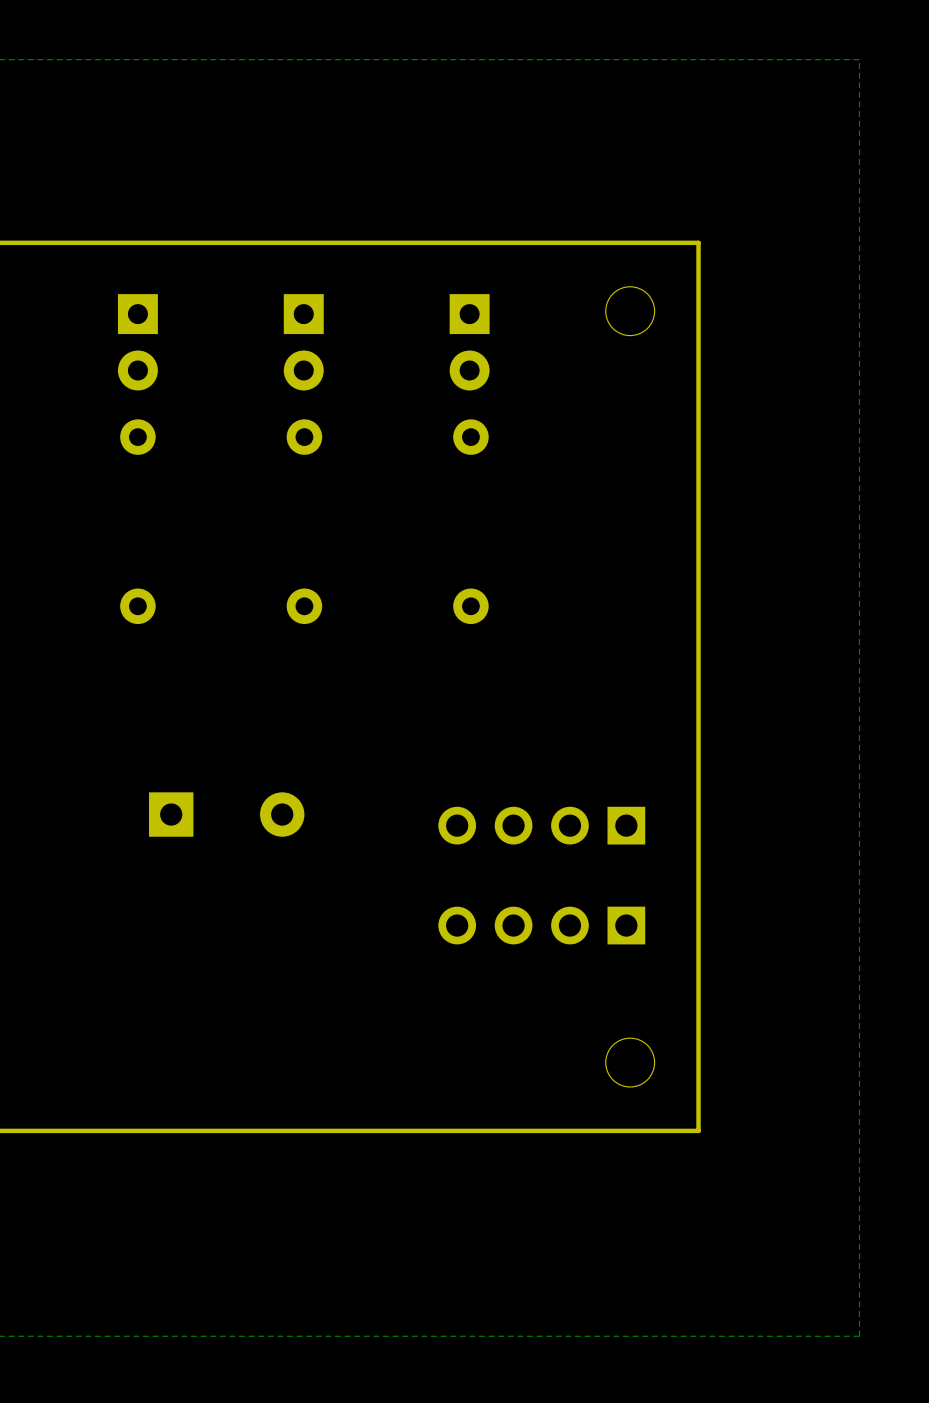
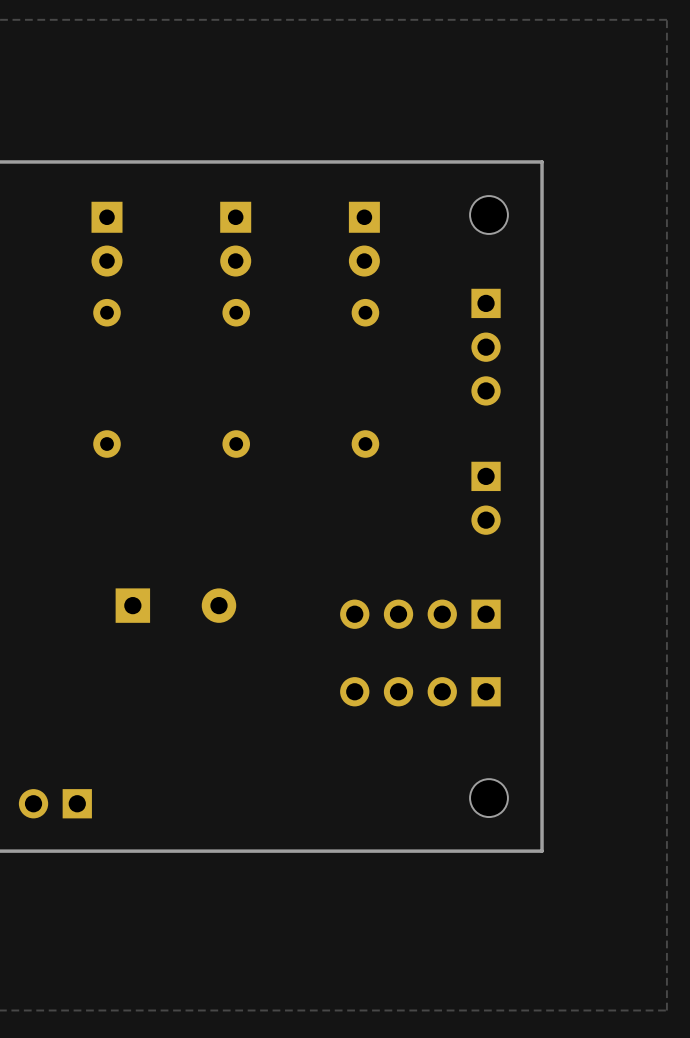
part: none -> (486, 347)
part: none -> (486, 498)
part: none -> (55, 803)

